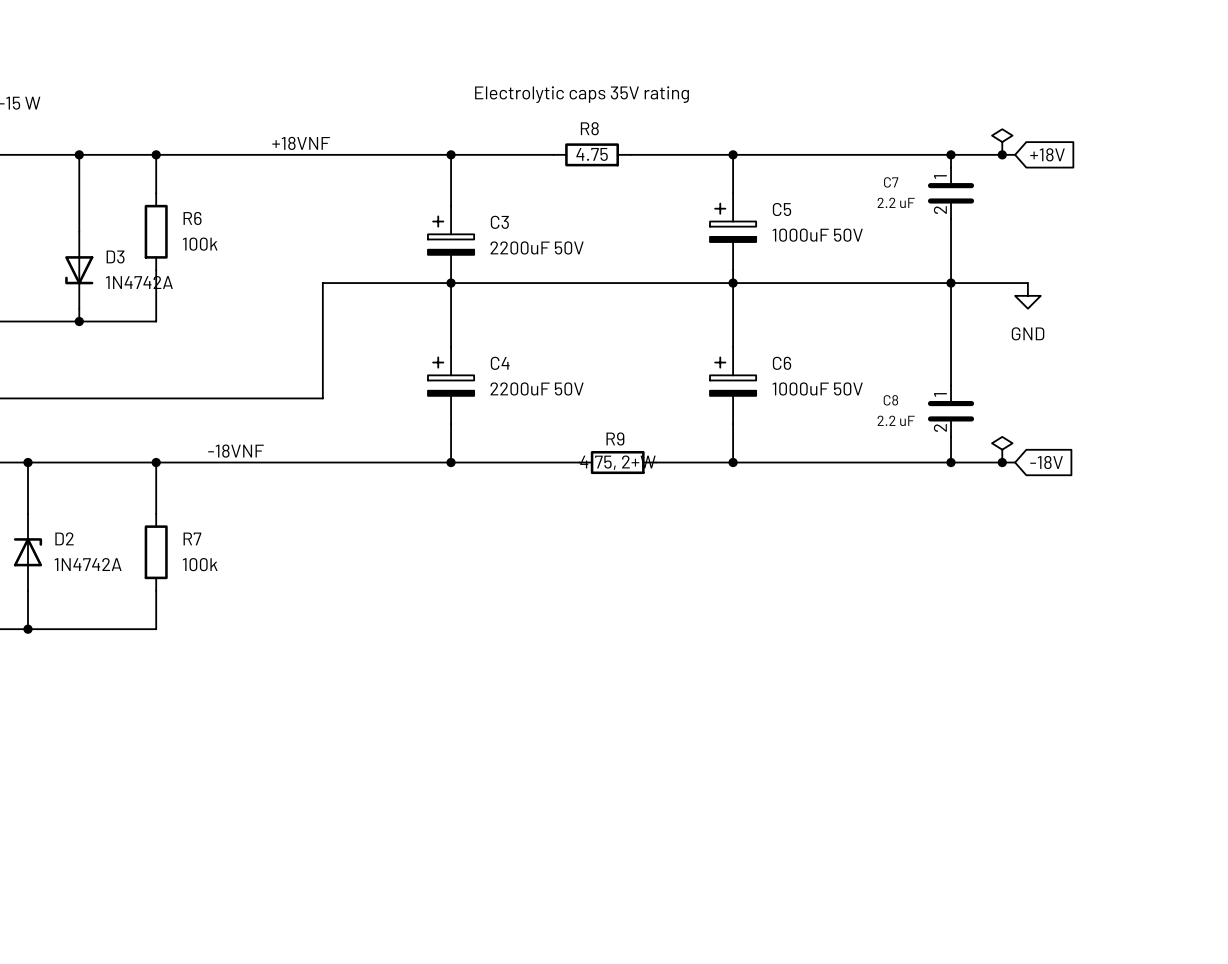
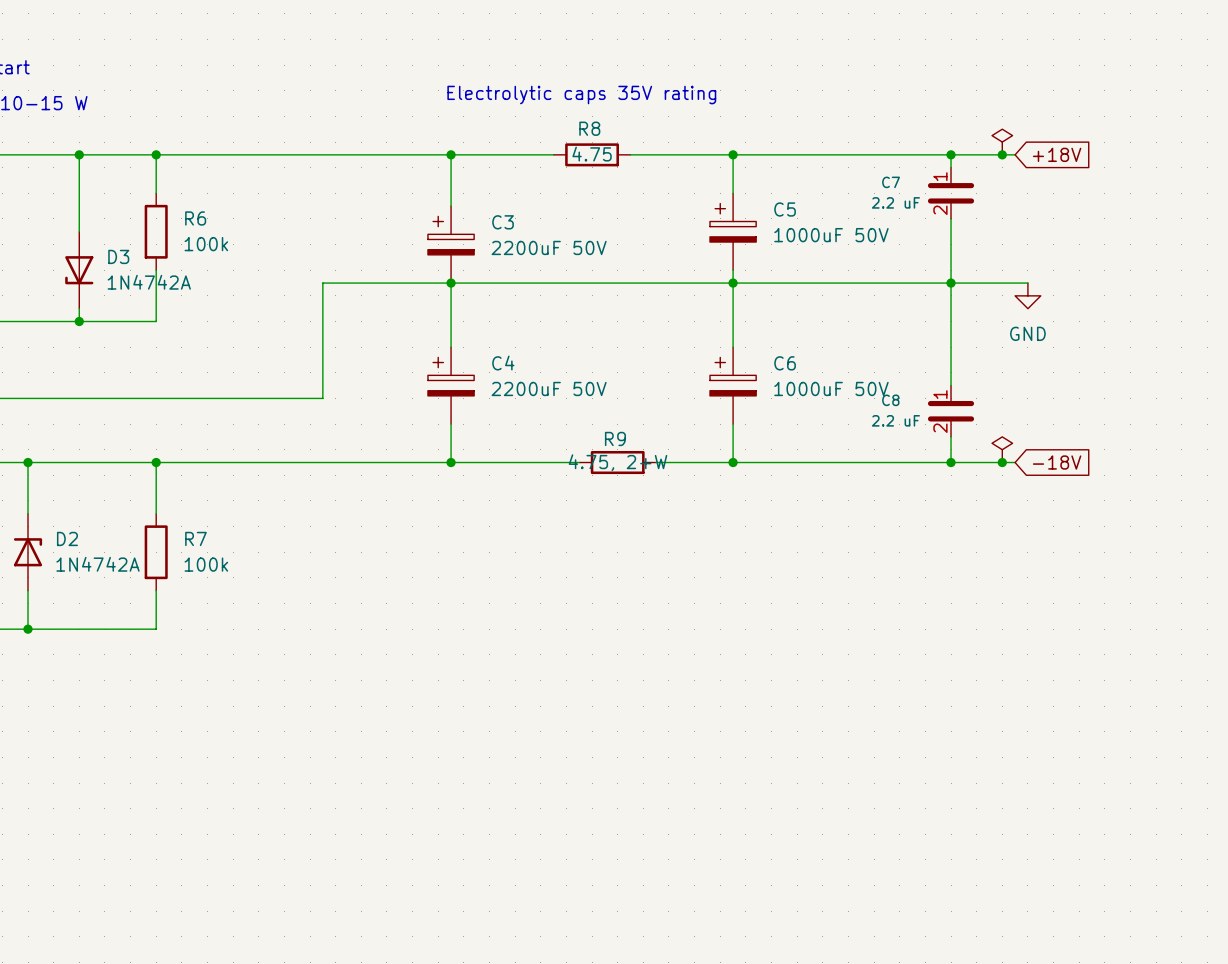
label: +18VNF (301, 143) -> none
label: -18VNF (236, 451) -> none

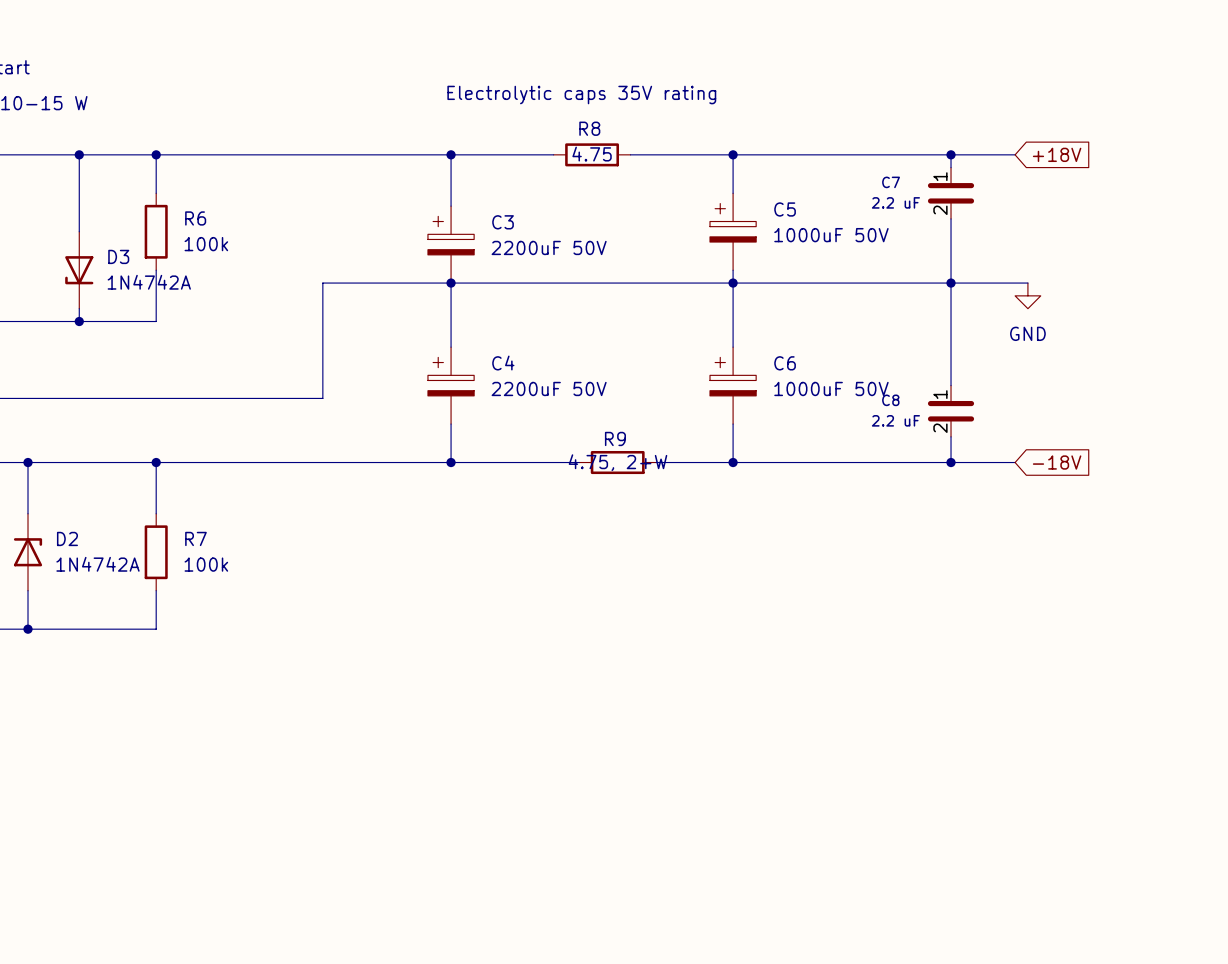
power symbol: (1002, 142) -> none
junction: (1002, 154) -> none
power symbol: (1002, 449) -> none
junction: (1002, 462) -> none

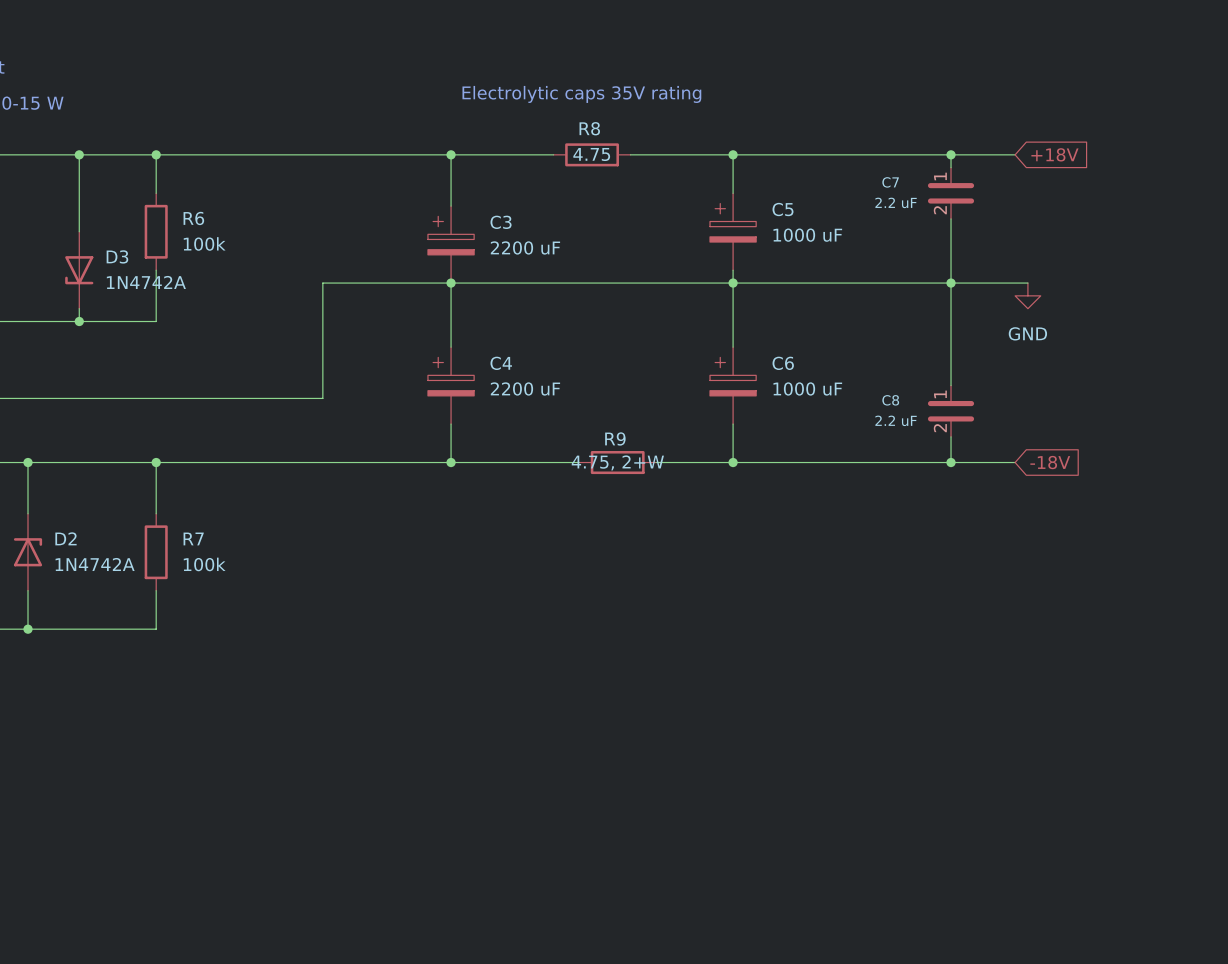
C5 value: 1000uF 50V (831, 235) -> 1000 uF (807, 235)
C3 value: 2200uF 50V (549, 247) -> 2200 uF (525, 247)
C4 value: 2200uF 50V (549, 388) -> 2200 uF (525, 388)
C6 value: 1000uF 50V (831, 388) -> 1000 uF (807, 388)

